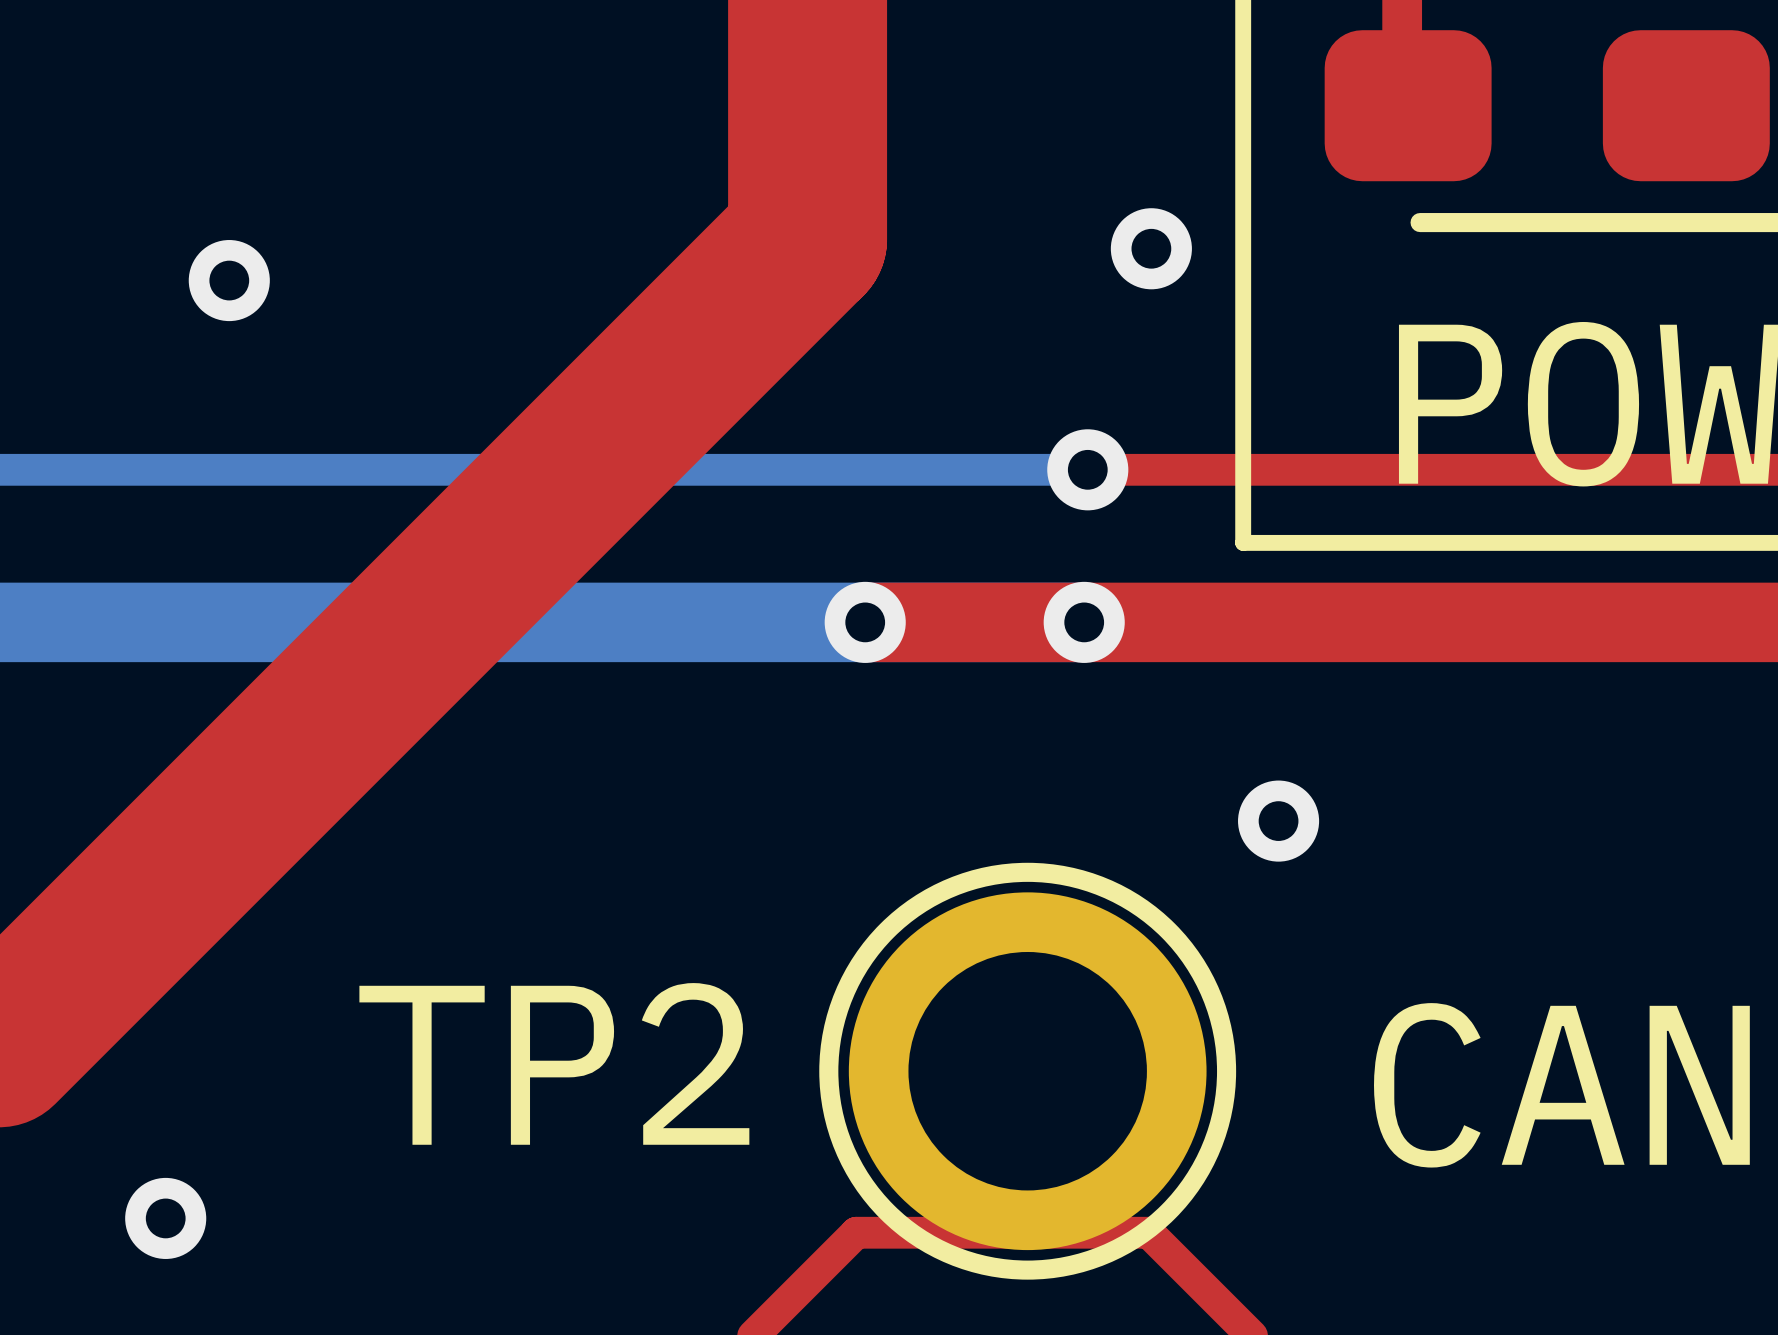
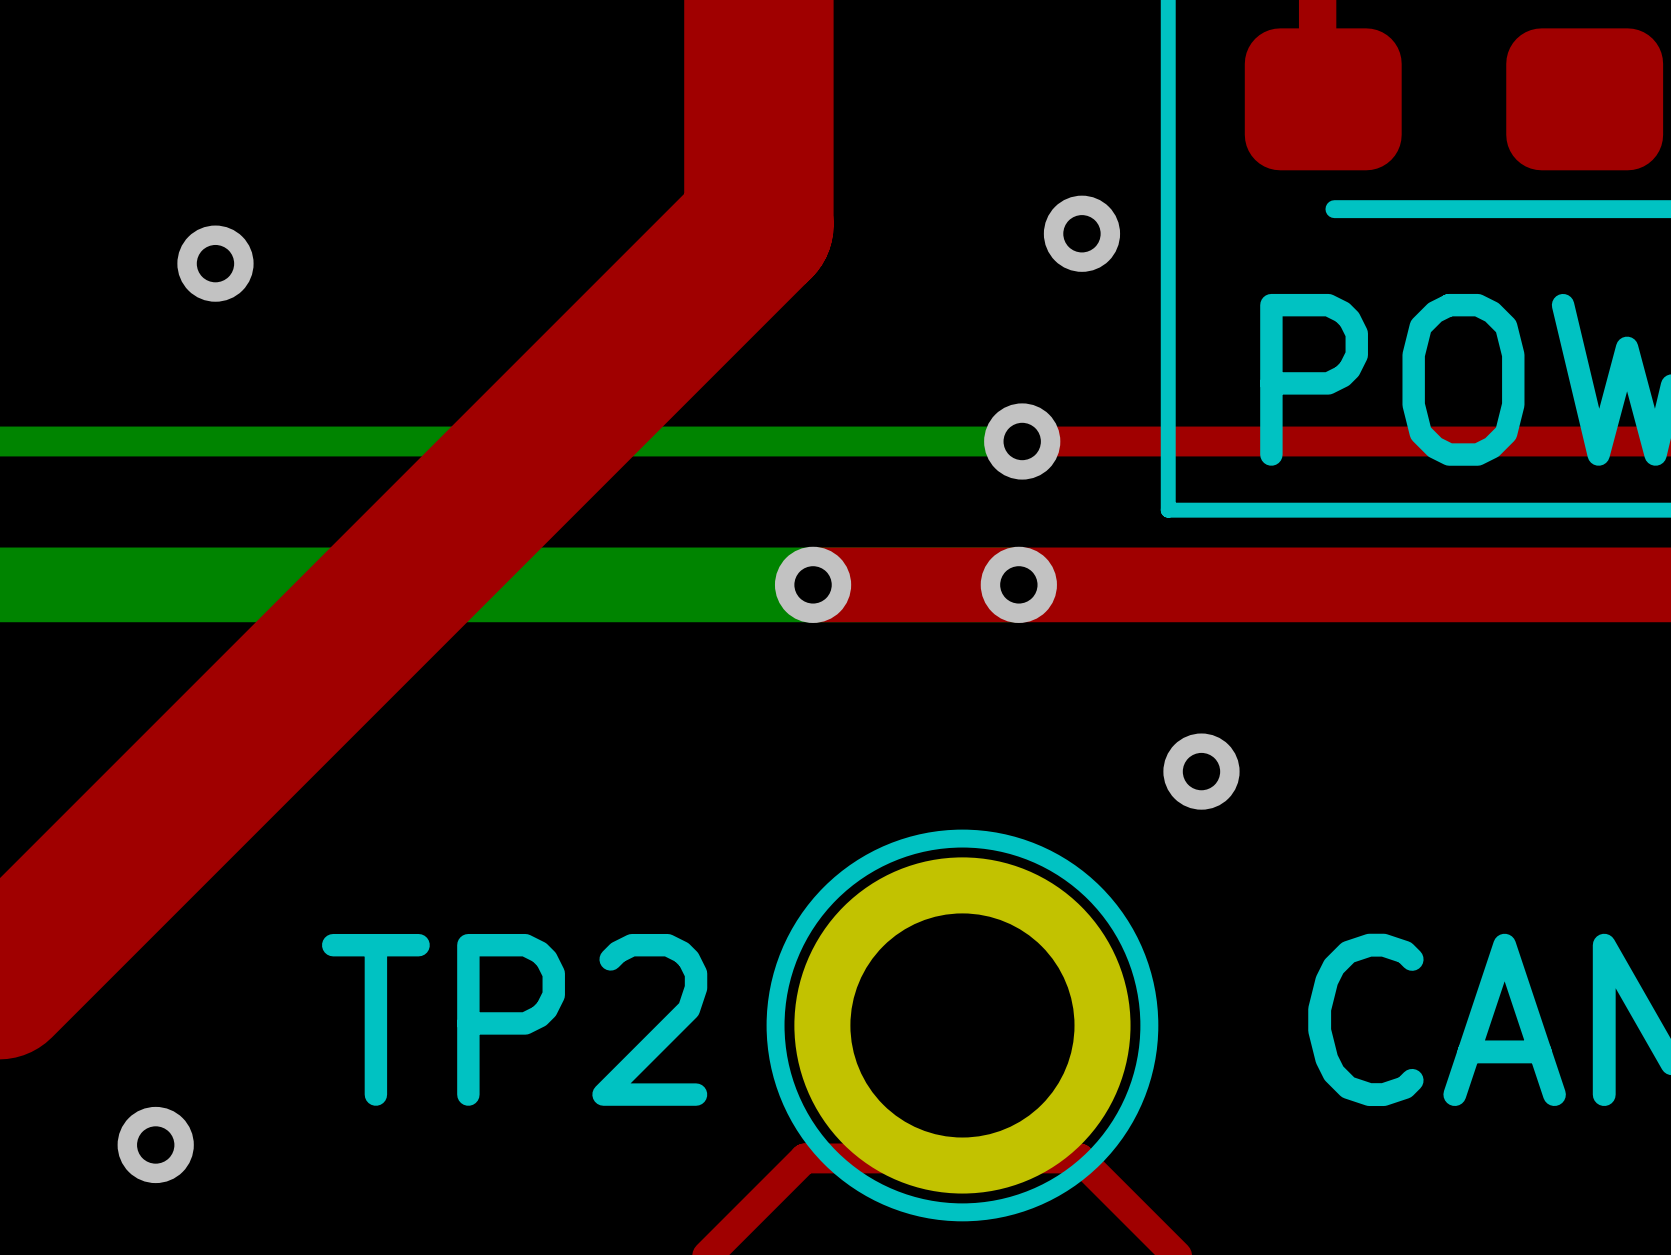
TP2 position: (1027, 1071) -> (962, 1025)

